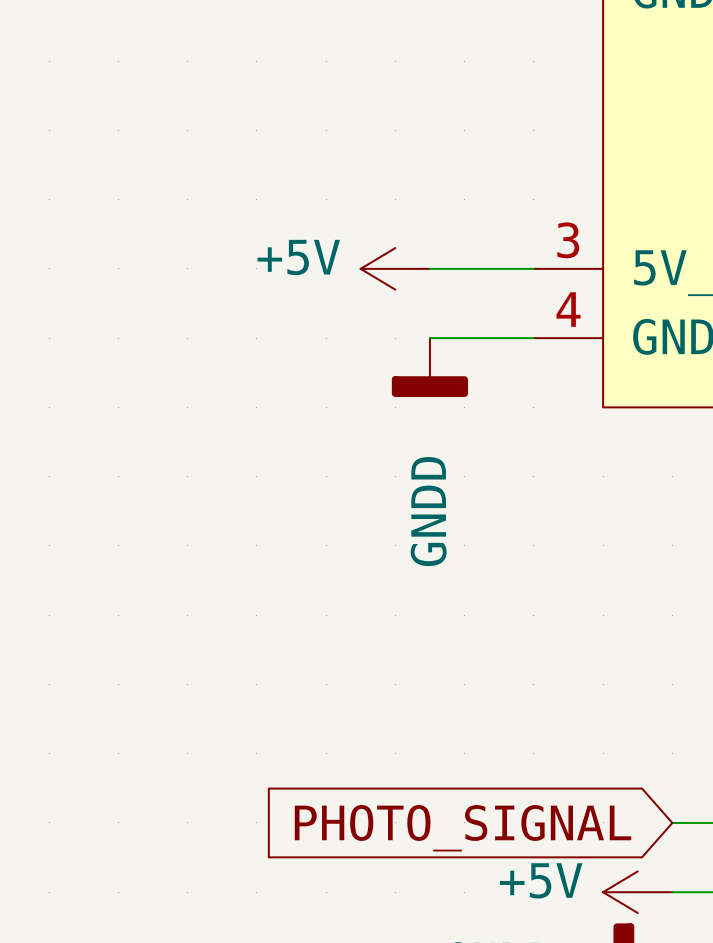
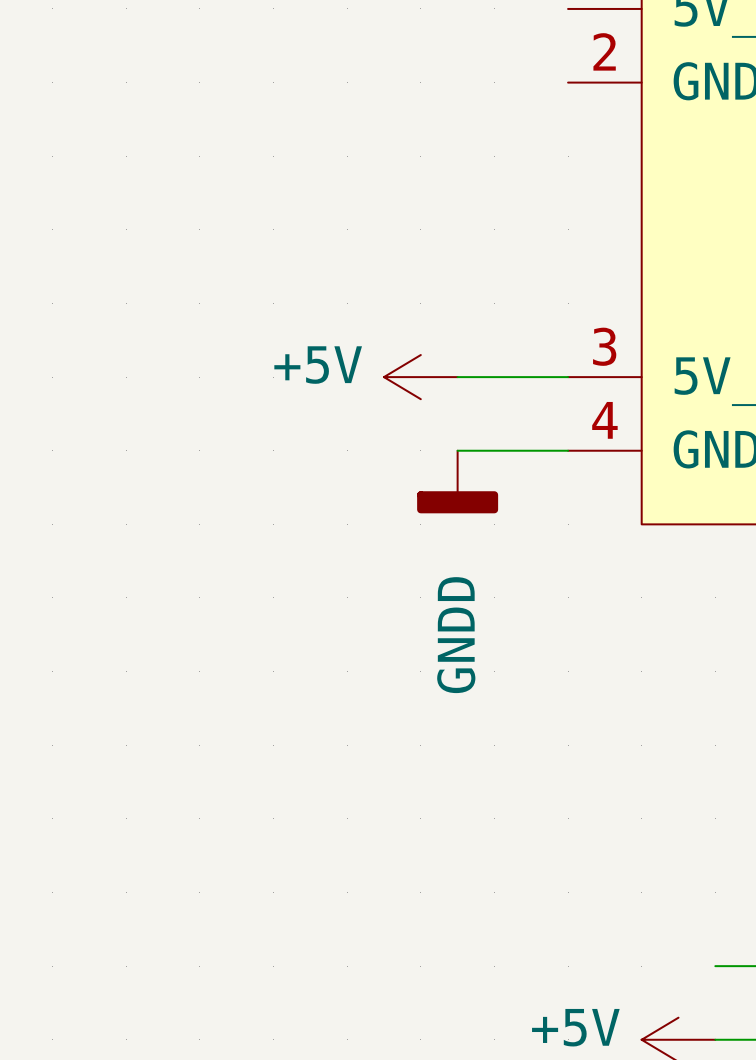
global label: PHOTO_SIGNAL (463, 828) -> none

